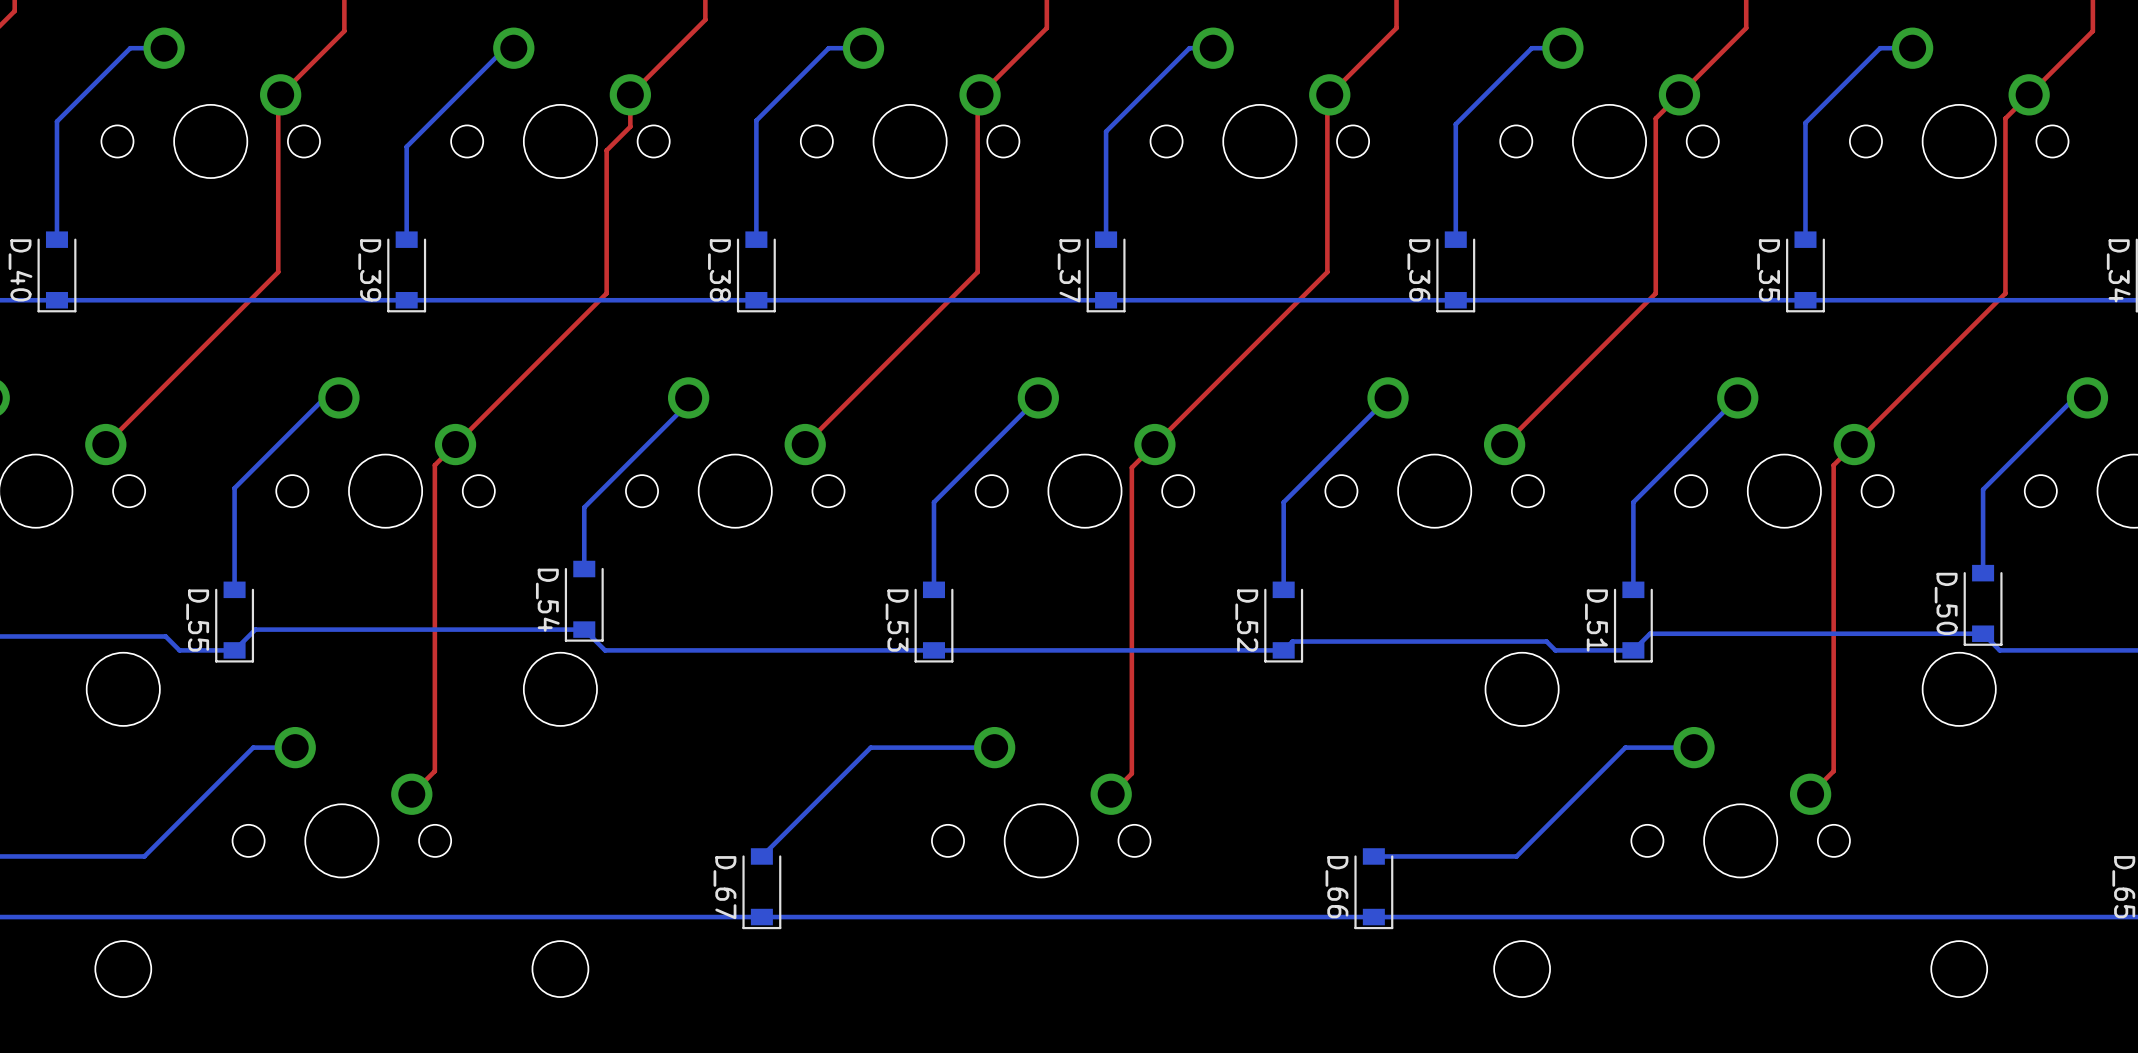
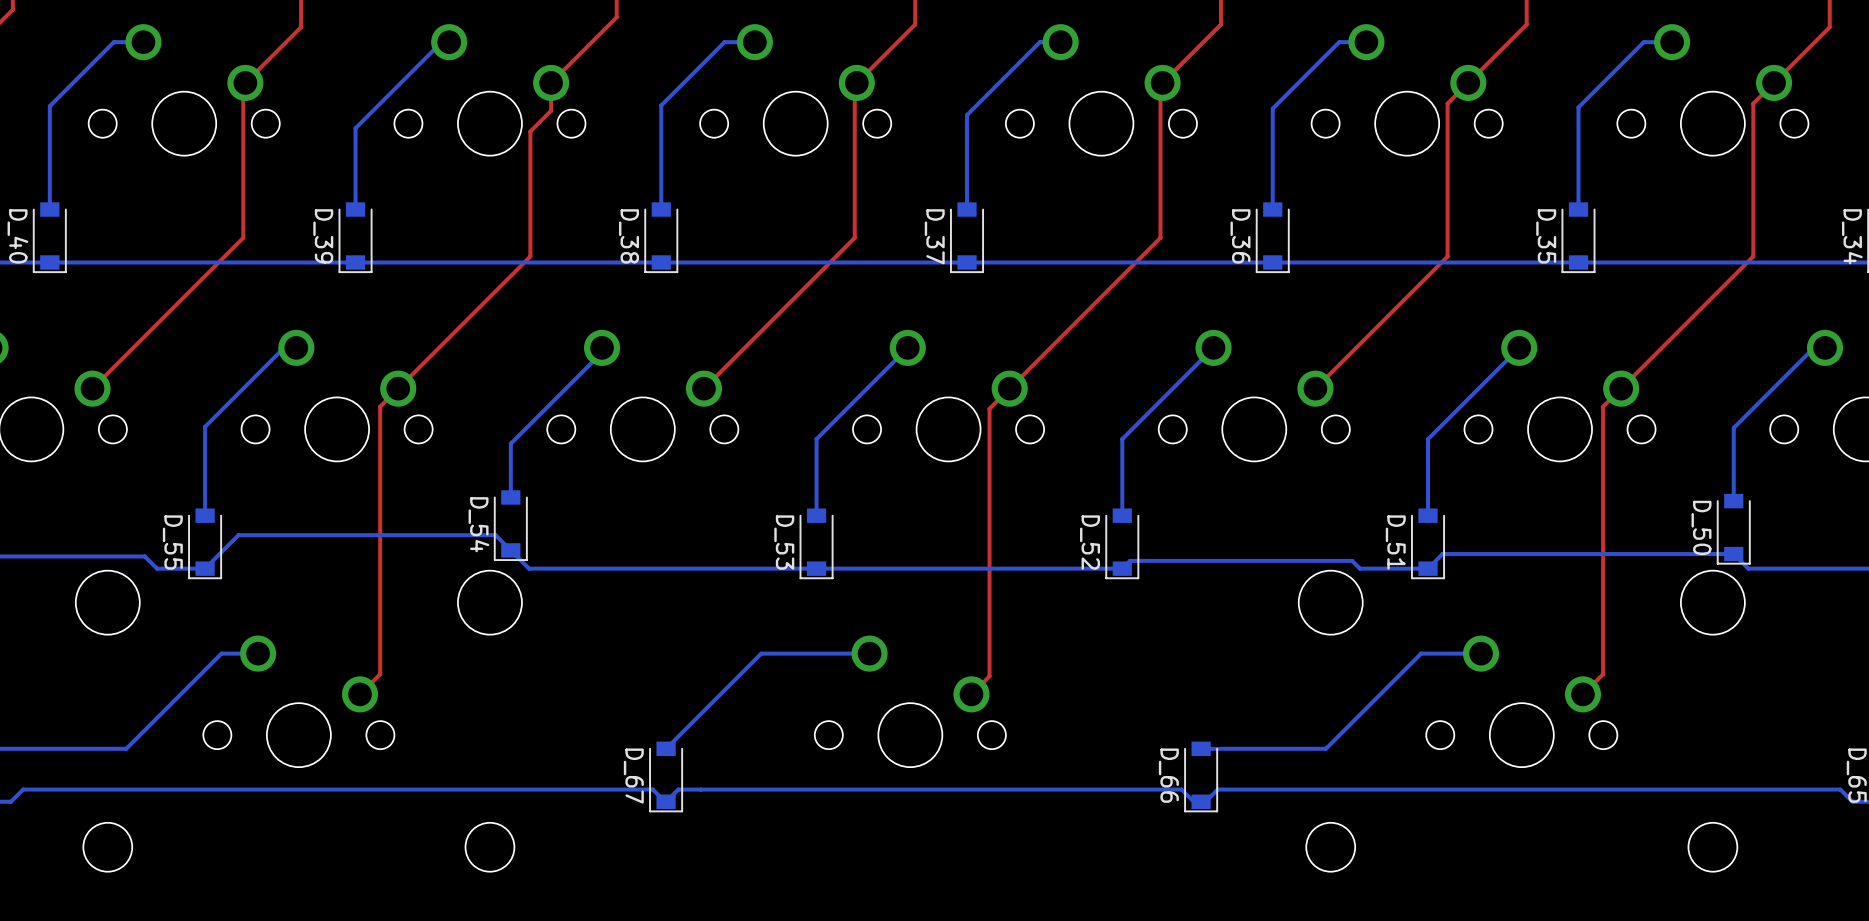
bottom track: (584, 629) (255, 629) -> (510, 550) (495, 535) (238, 535) (223, 550)
bottom track: (760, 917) (12, 917) -> (664, 801) (652, 789) (23, 789) (10, 801)
bottom track: (1365, 917) (761, 917) -> (1193, 801) (1181, 789) (678, 789) (666, 801)
bottom track: (2119, 917) (1378, 917) -> (1852, 801) (1840, 789) (1217, 789) (1205, 801)

